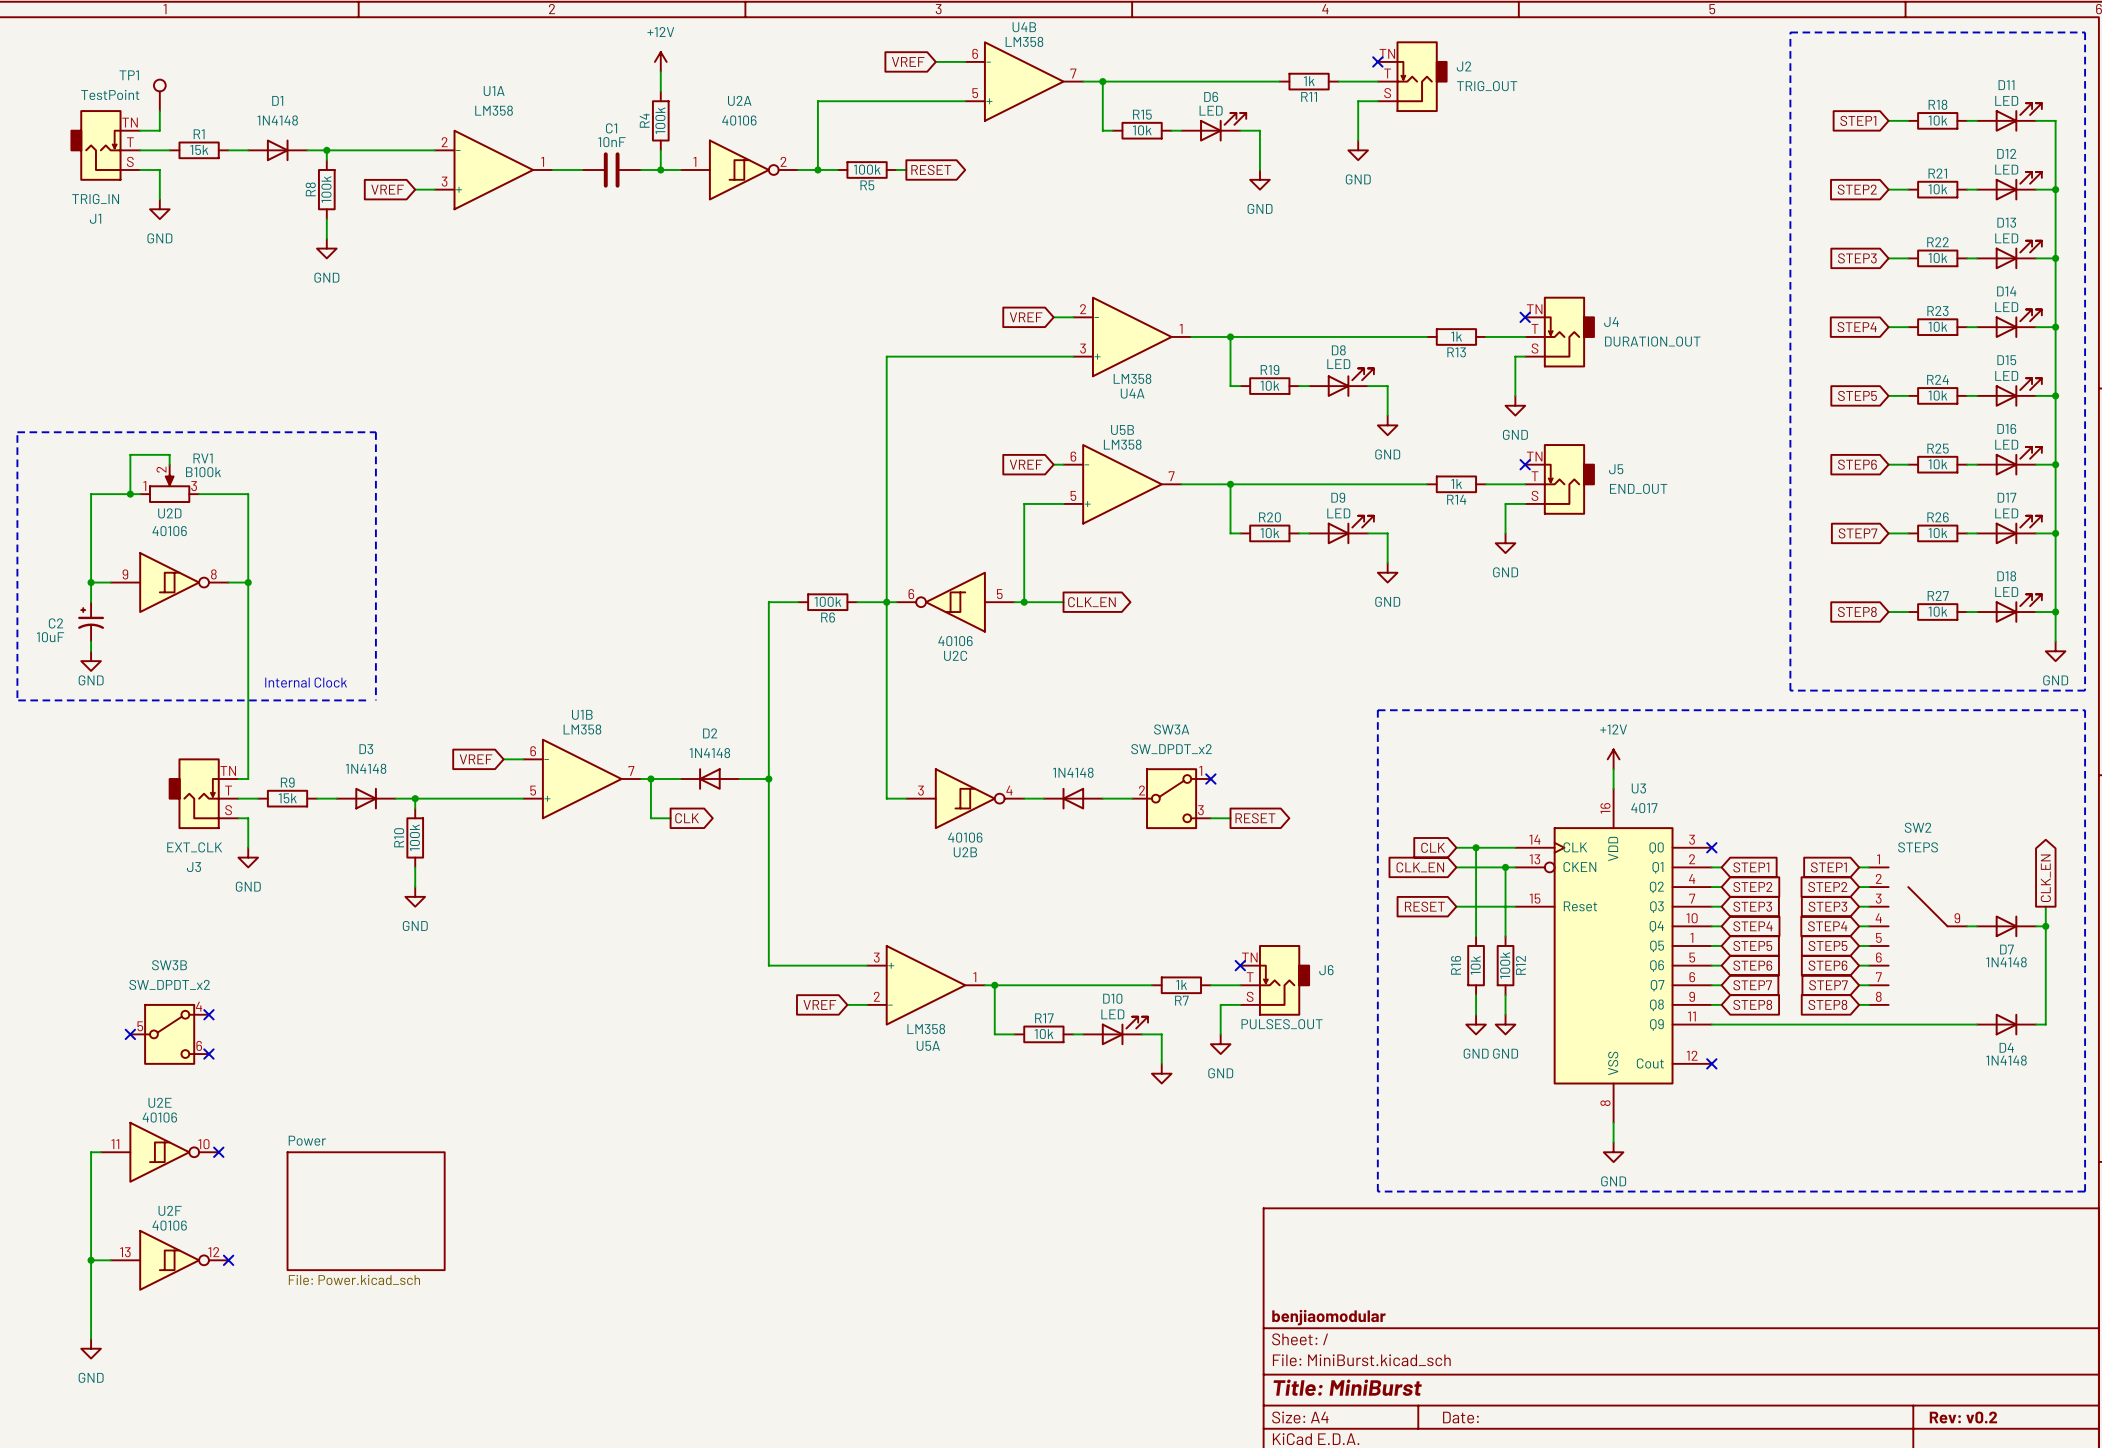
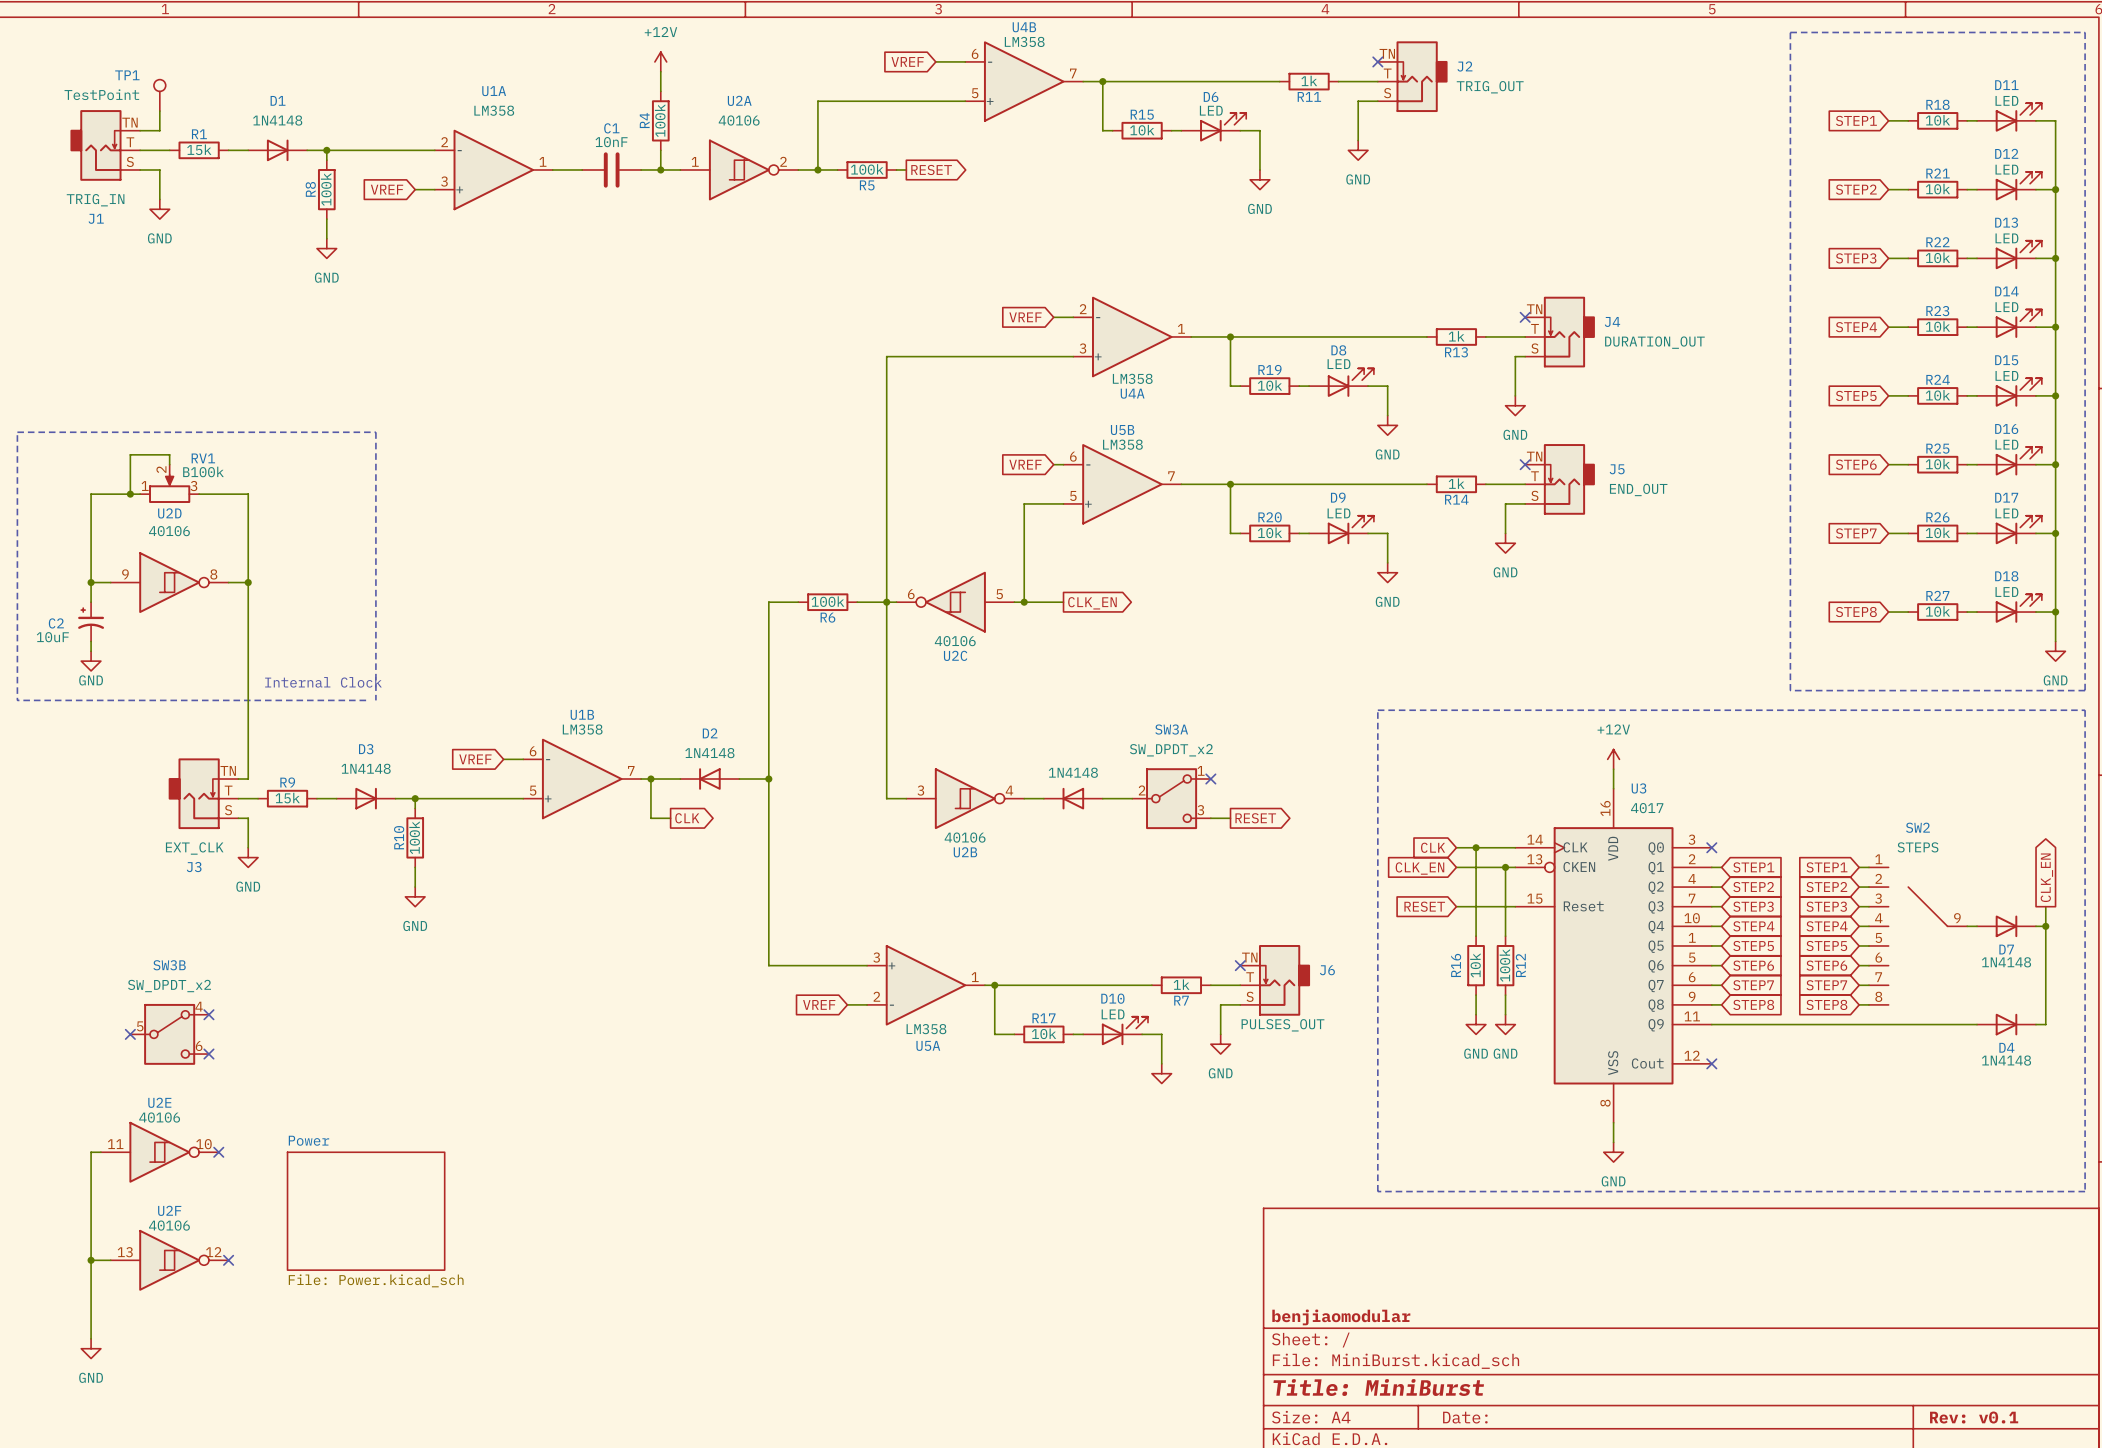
title block: Rev: v0.2 (1963, 1417) -> Rev: v0.1 (1974, 1417)

